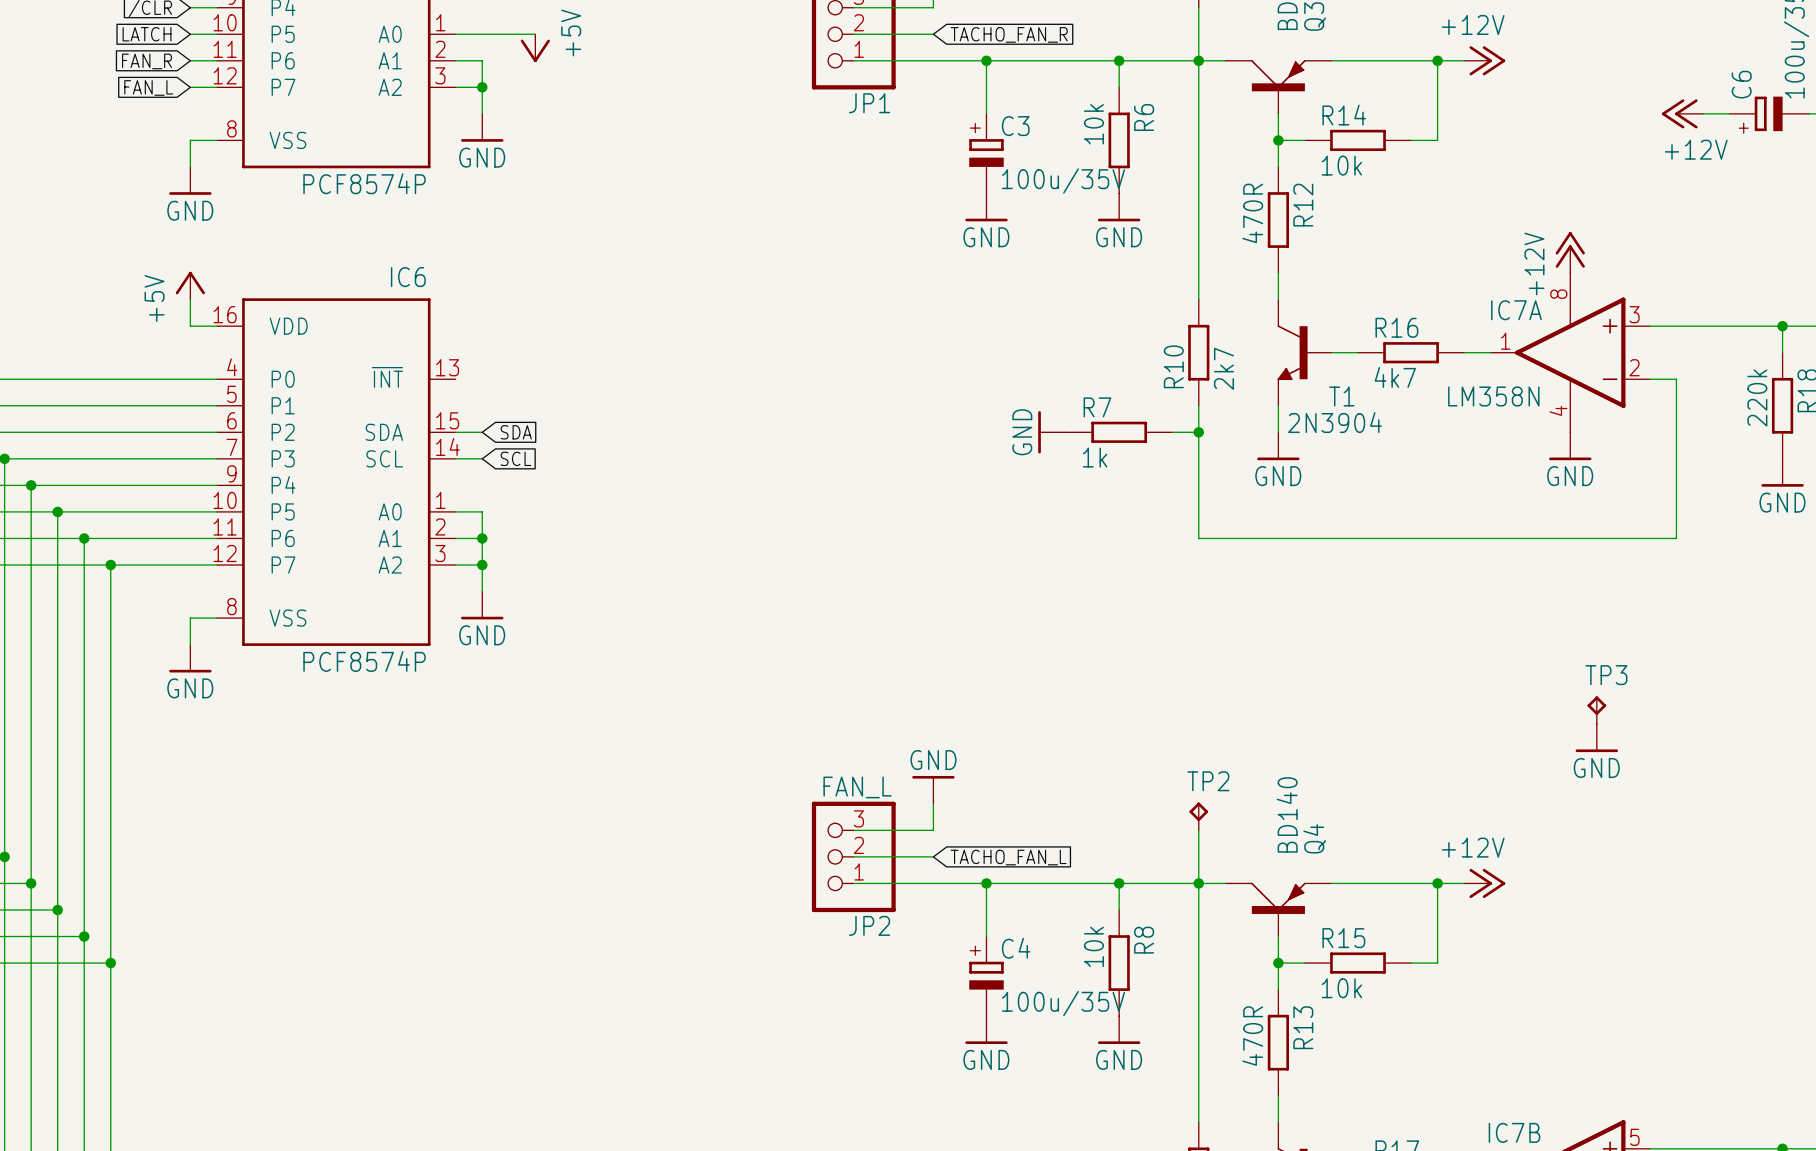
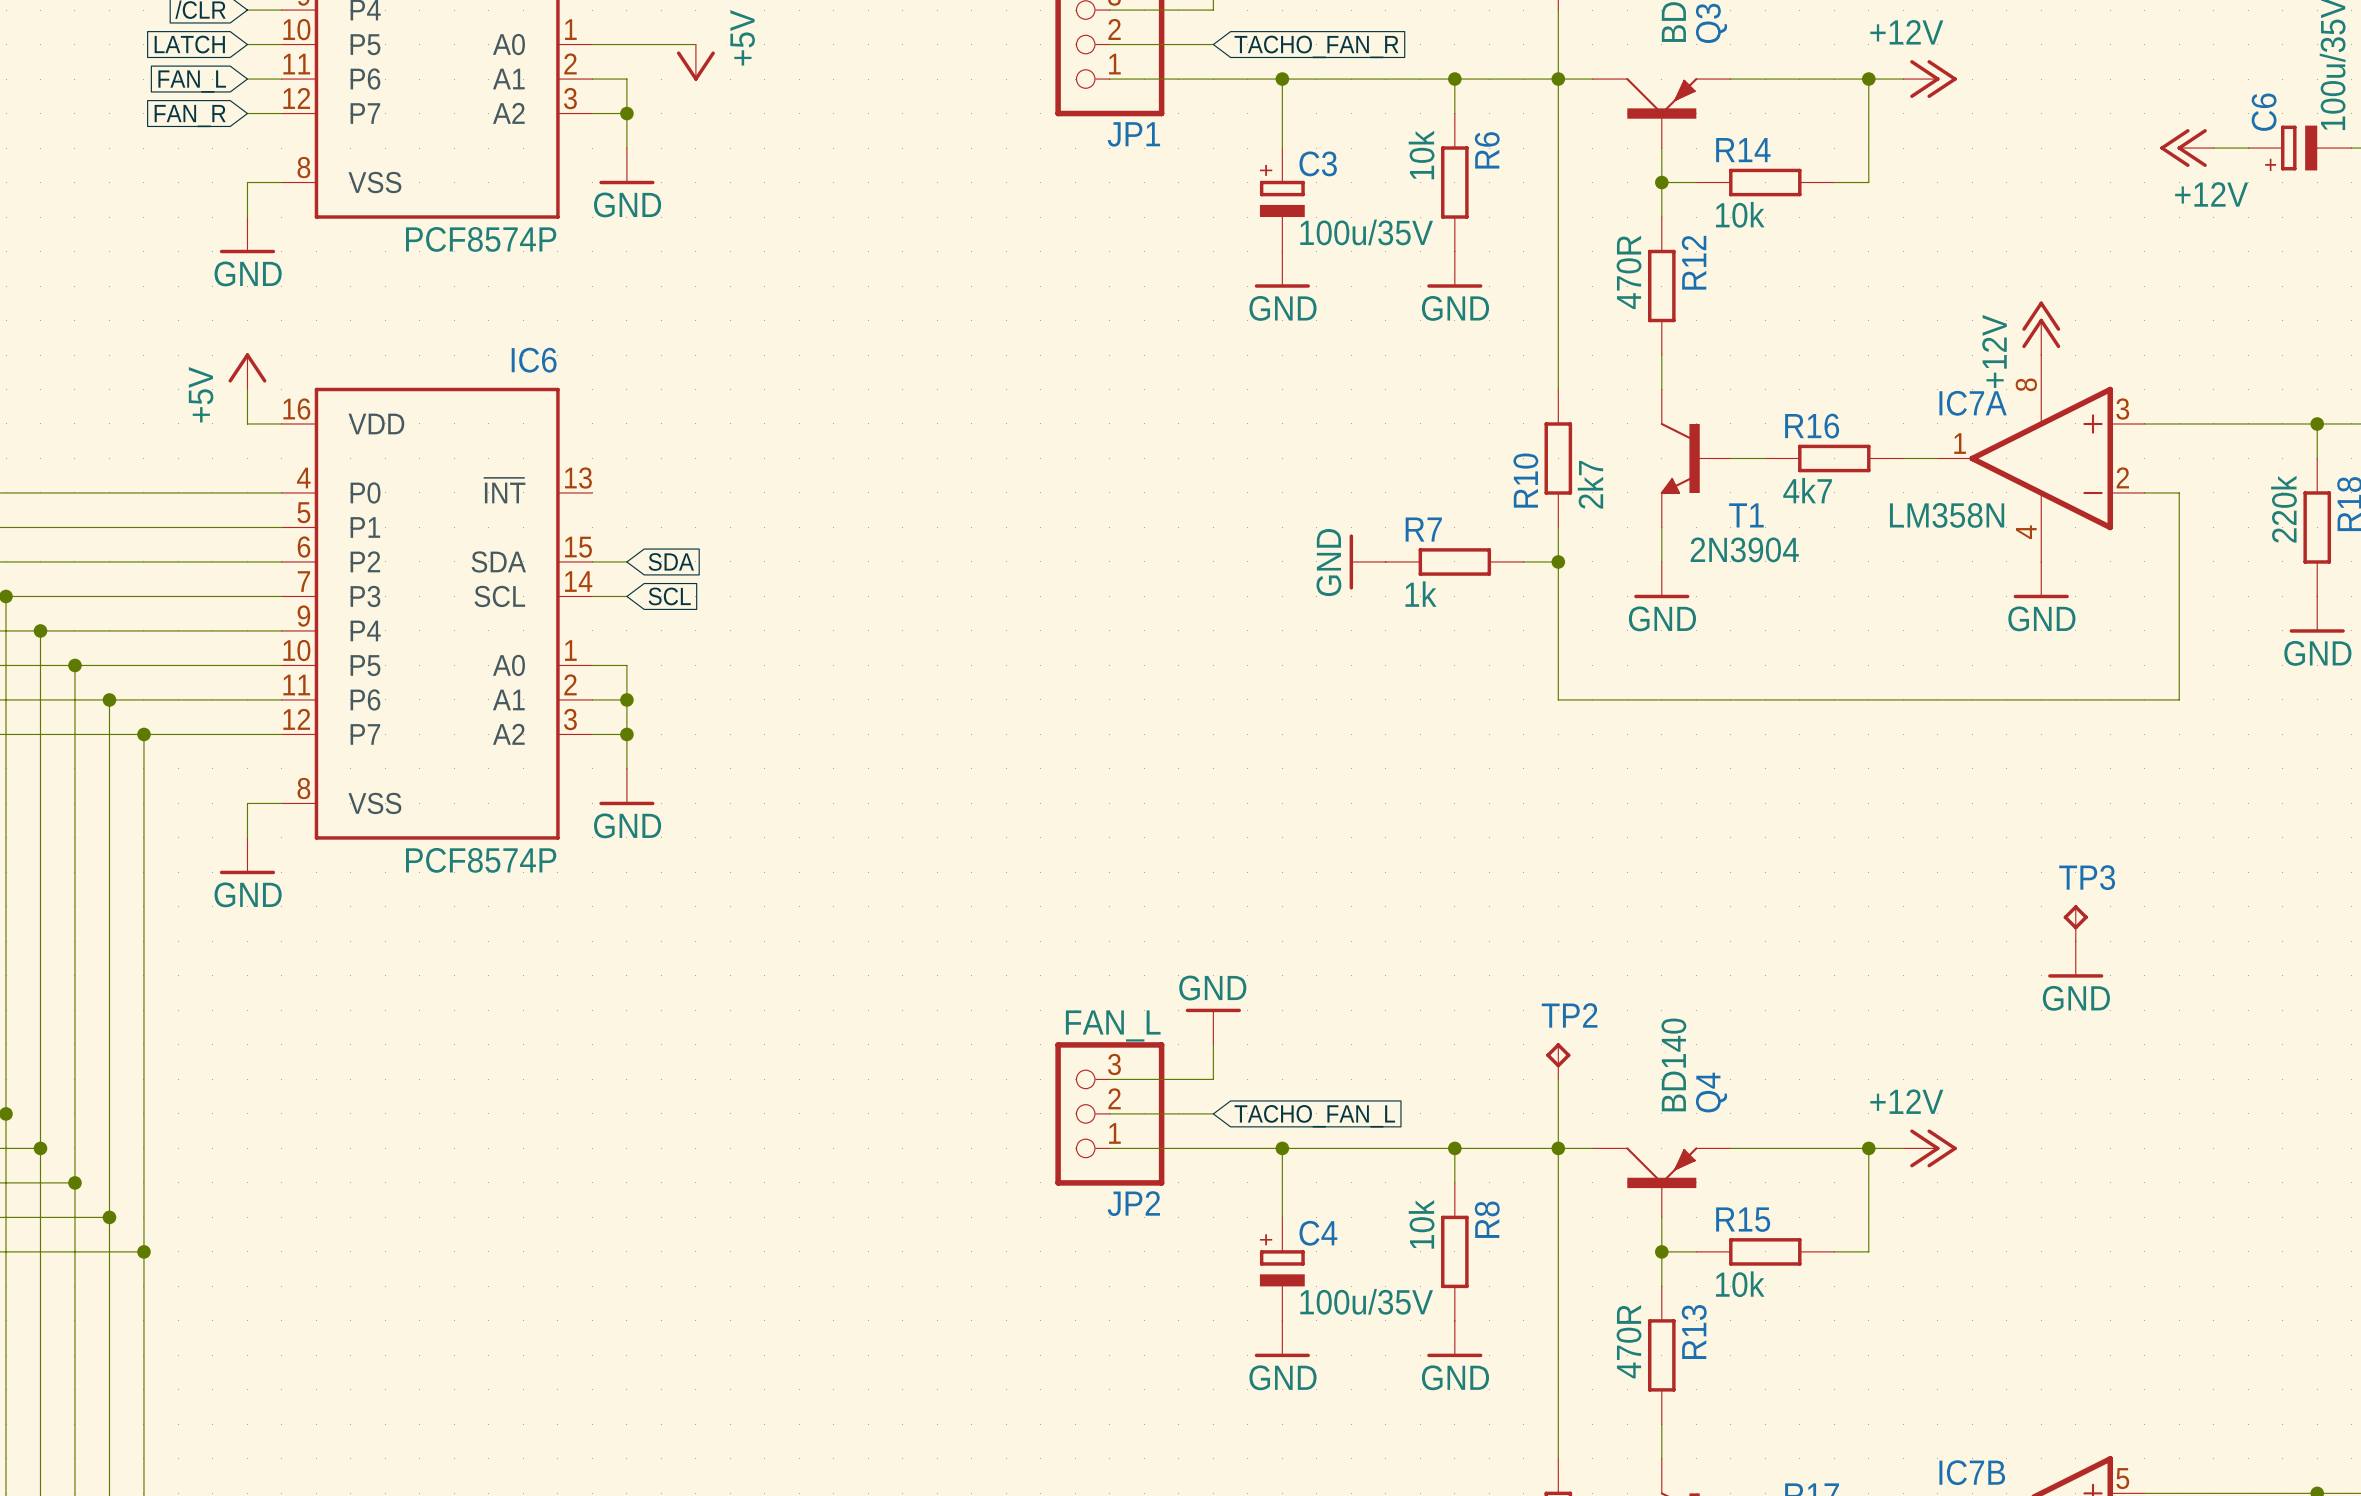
global label: FAN_R (147, 61) -> FAN_L (192, 81)
global label: FAN_L (148, 87) -> FAN_R (190, 116)

